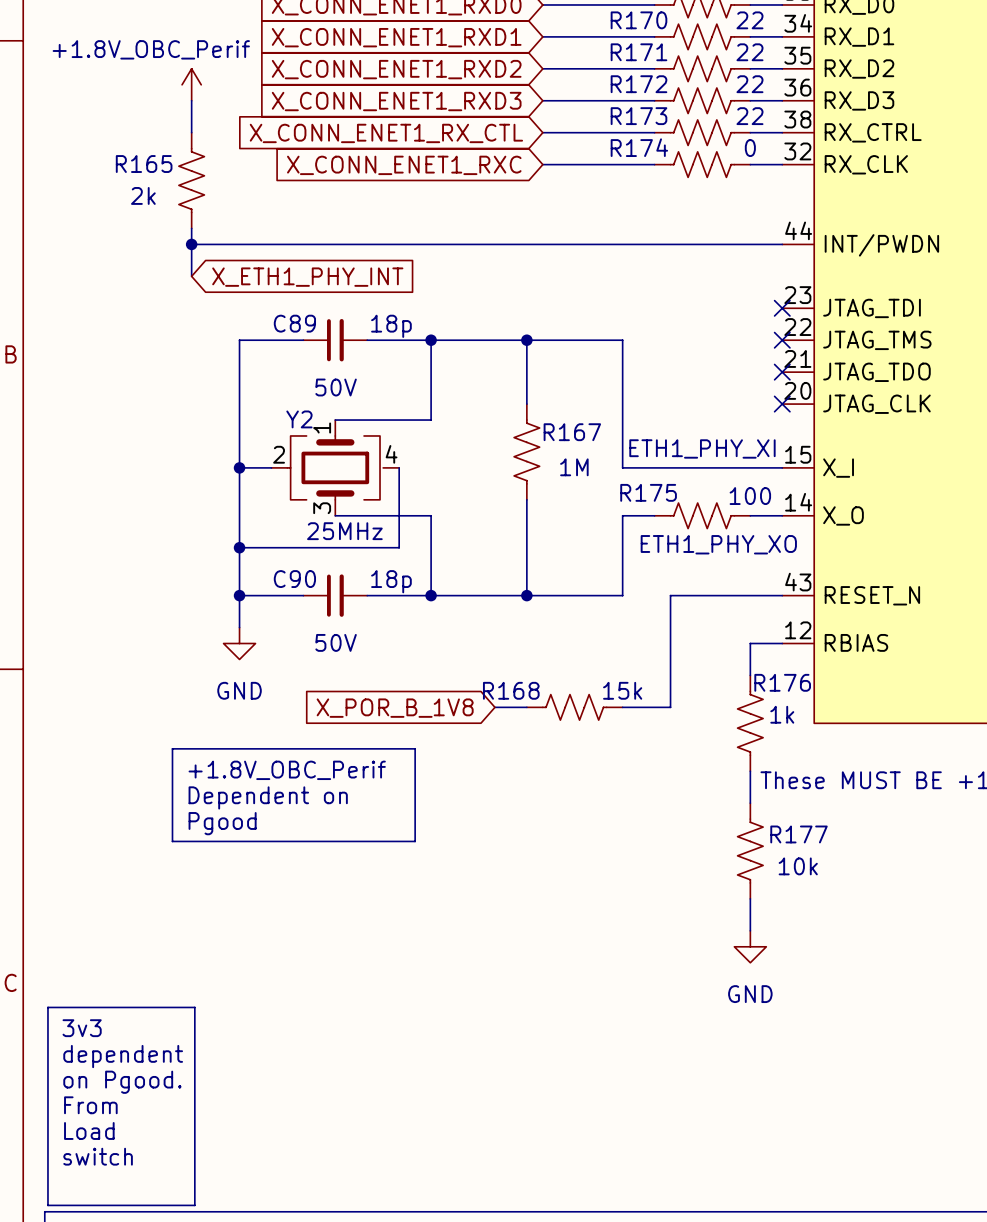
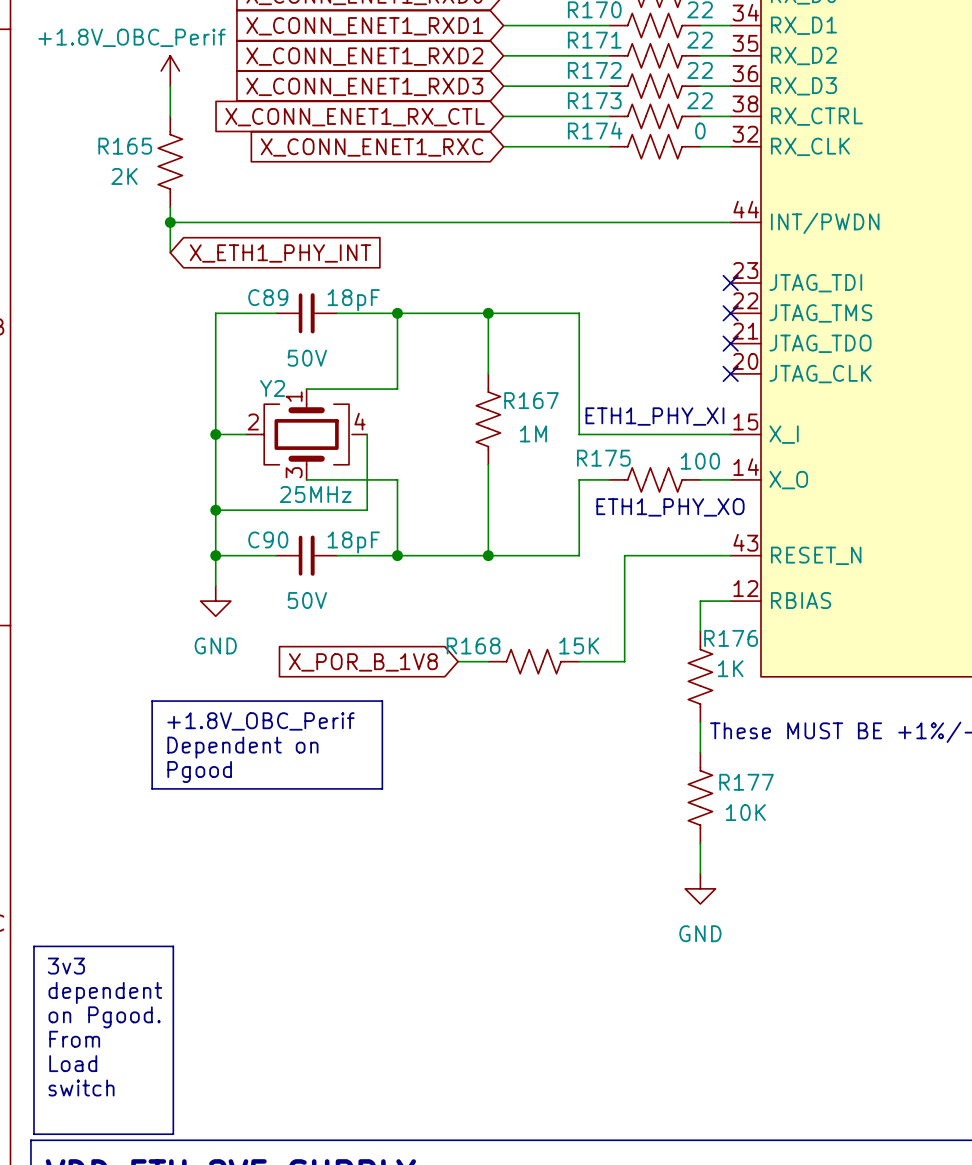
R165 value: 2k (143, 195) -> 2K (124, 176)
C89 value: 18p (391, 326) -> 18pF (353, 300)
C90 value: 18p (391, 581) -> 18pF (353, 542)
R168 value: 15k (622, 690) -> 15K (579, 645)
R176 value: 1k (782, 714) -> 1K (730, 668)
R177 value: 10k (798, 866) -> 10K (745, 812)

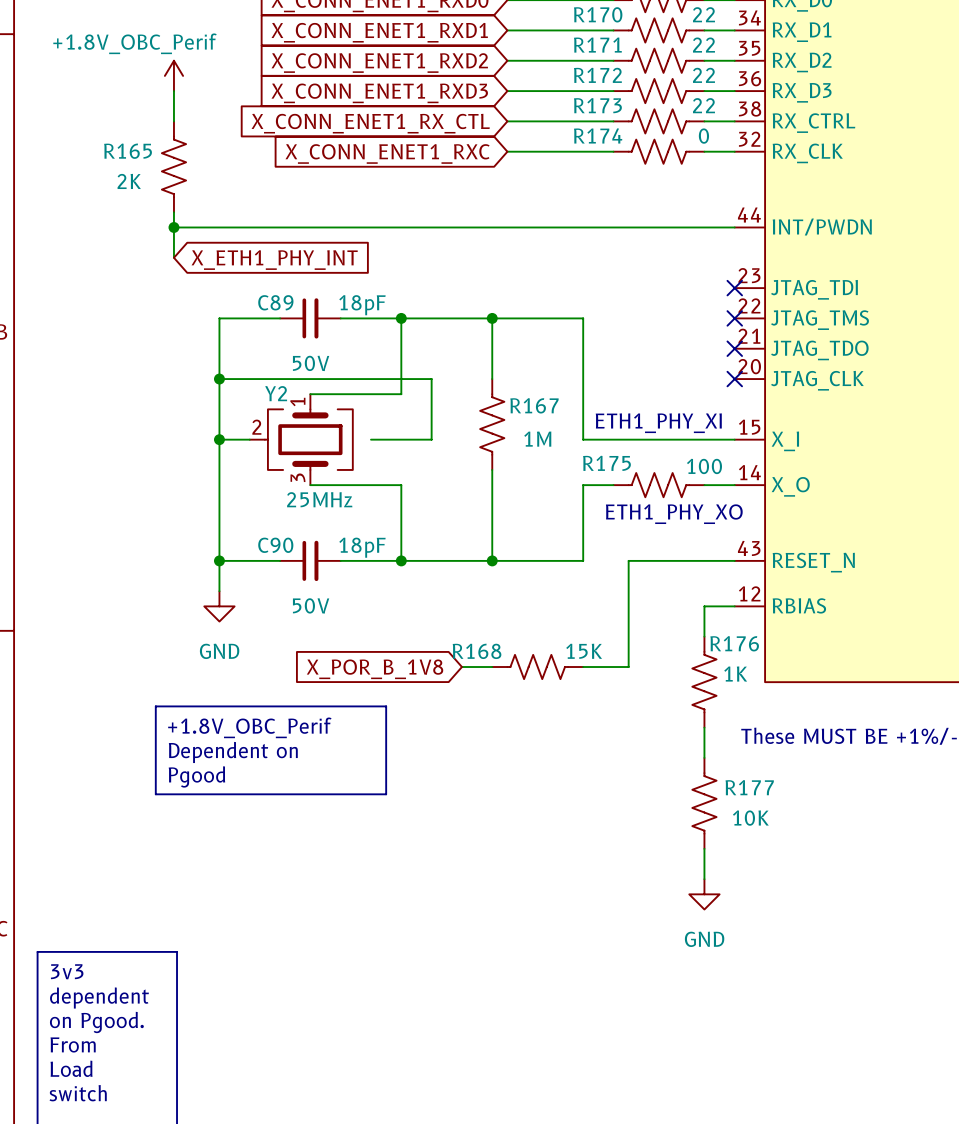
junction: none -> (219, 379)
Y2 symbol: [246, 389, 368, 480] -> [249, 394, 353, 486]
wire: (367, 434) (367, 510) (215, 510) -> (371, 439) (431, 439) (431, 379) (219, 379)
junction: (215, 510) -> none

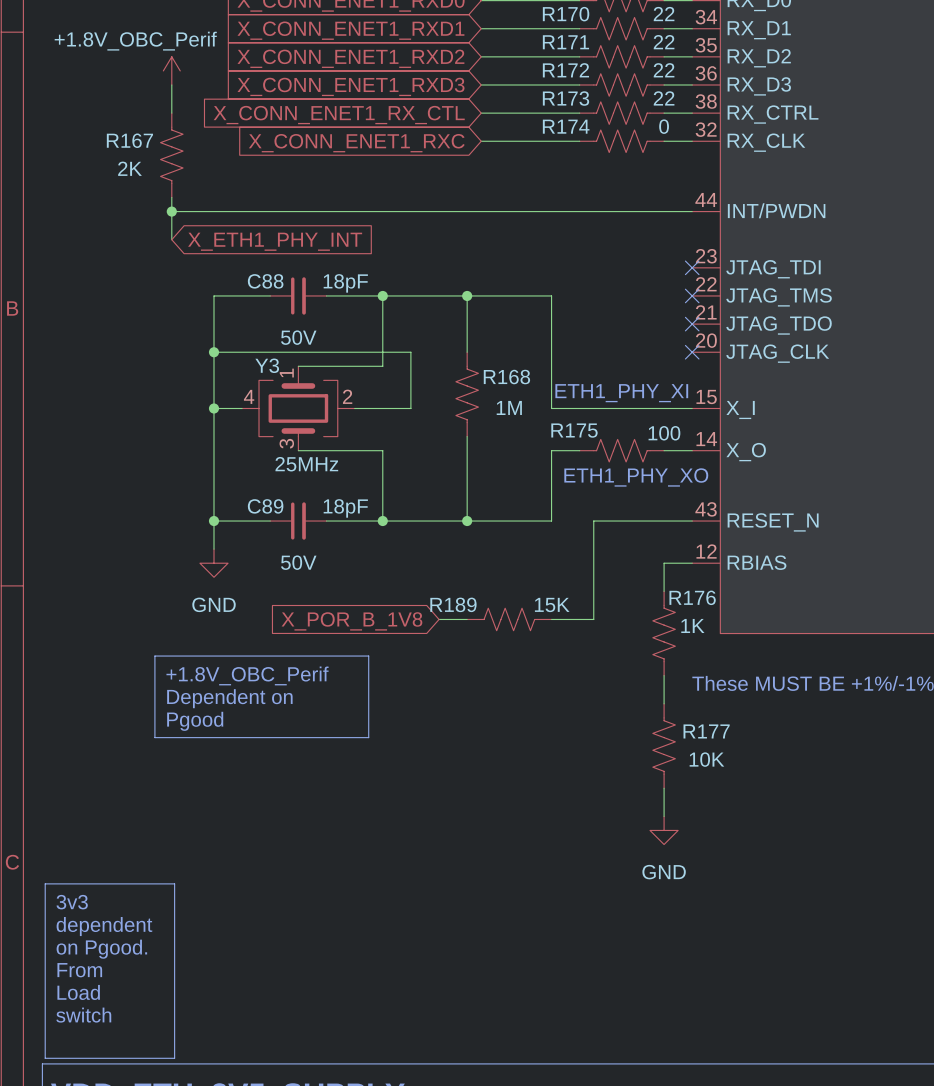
R165 name: R165 (128, 151) -> R167 (129, 140)
C89 name: C89 (275, 302) -> C88 (265, 281)
R167 name: R167 (534, 405) -> R168 (506, 377)
Y2: 25MHz (301, 439) -> none
Y3: none -> 25MHz (298, 408)
C90 name: C90 (275, 545) -> C89 (265, 506)
R168 name: R168 (477, 651) -> R189 (453, 604)

